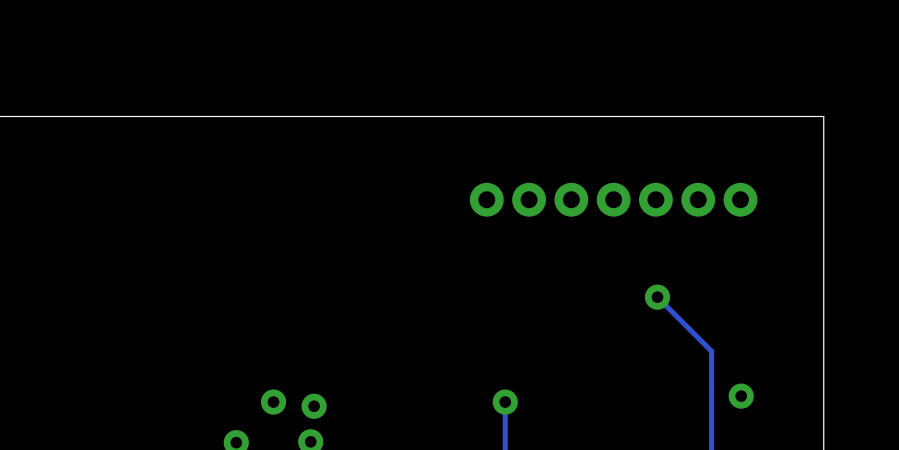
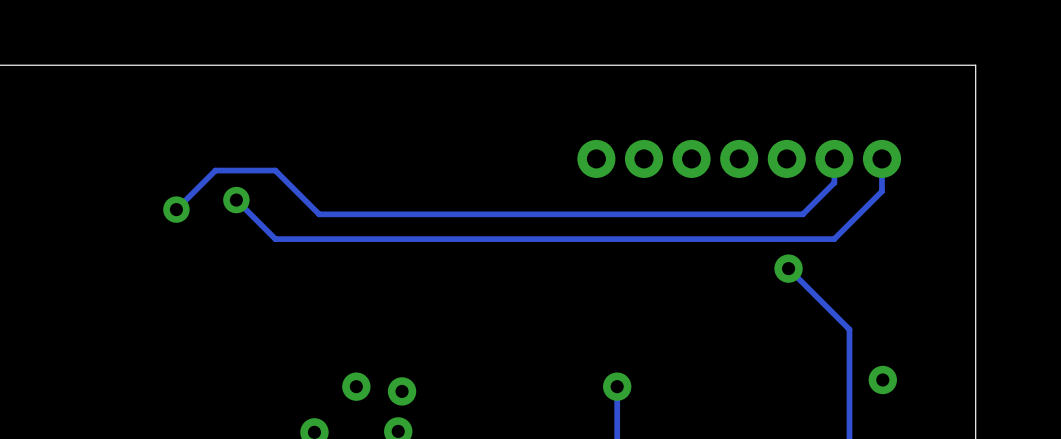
track: none -> (834, 158) (834, 182) (802, 214) (319, 214) (275, 170) (215, 170) (176, 209)
track: none -> (881, 158) (881, 191) (834, 239) (275, 239) (236, 200)
via: none -> (236, 200)
via: none -> (176, 209)

